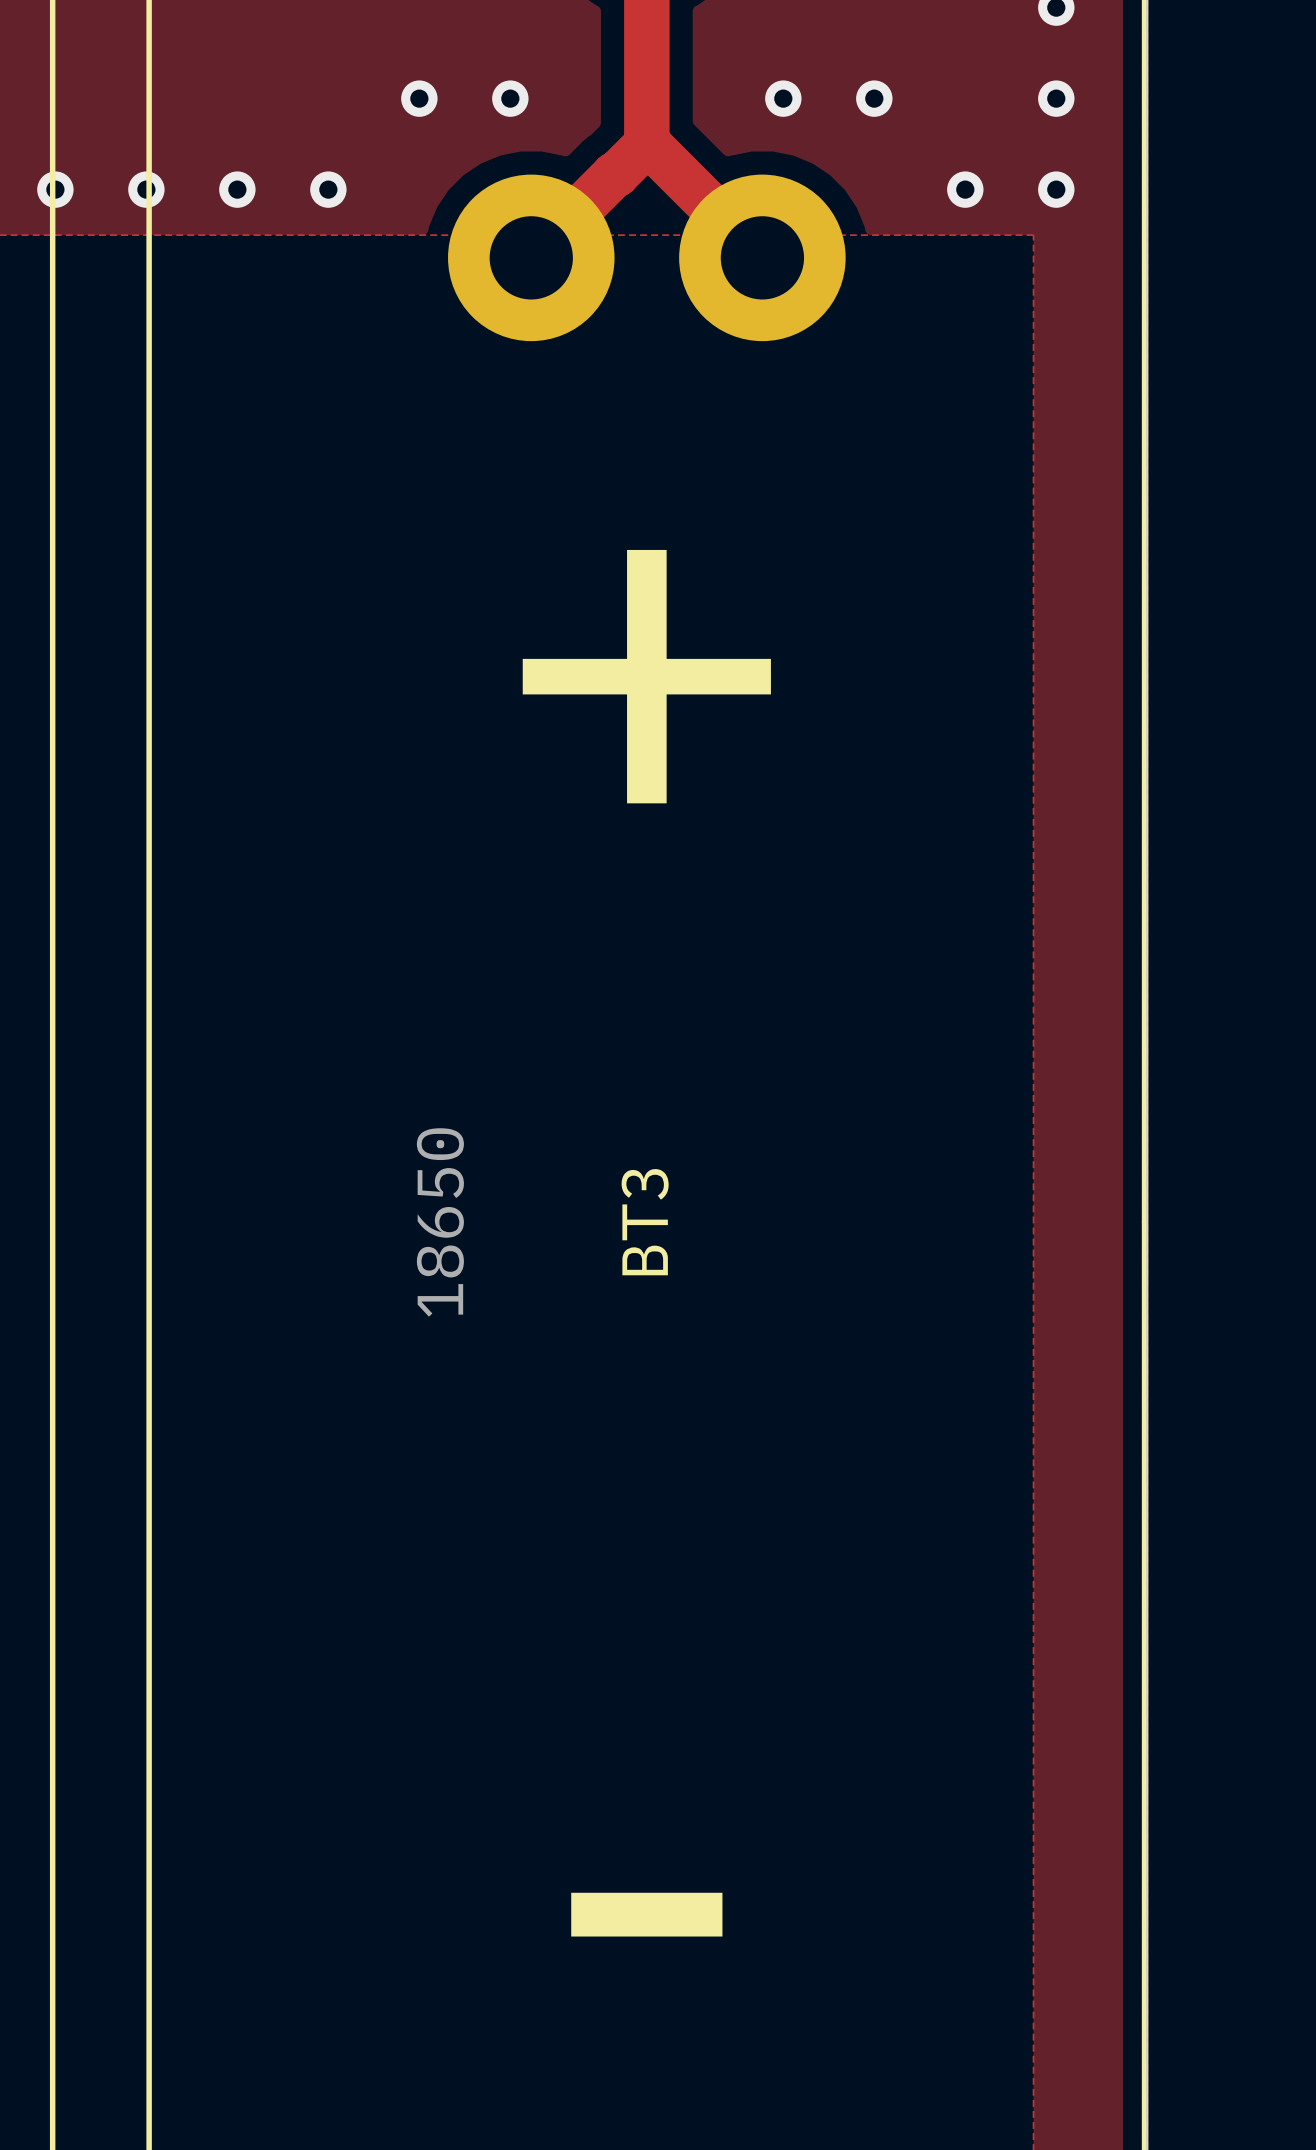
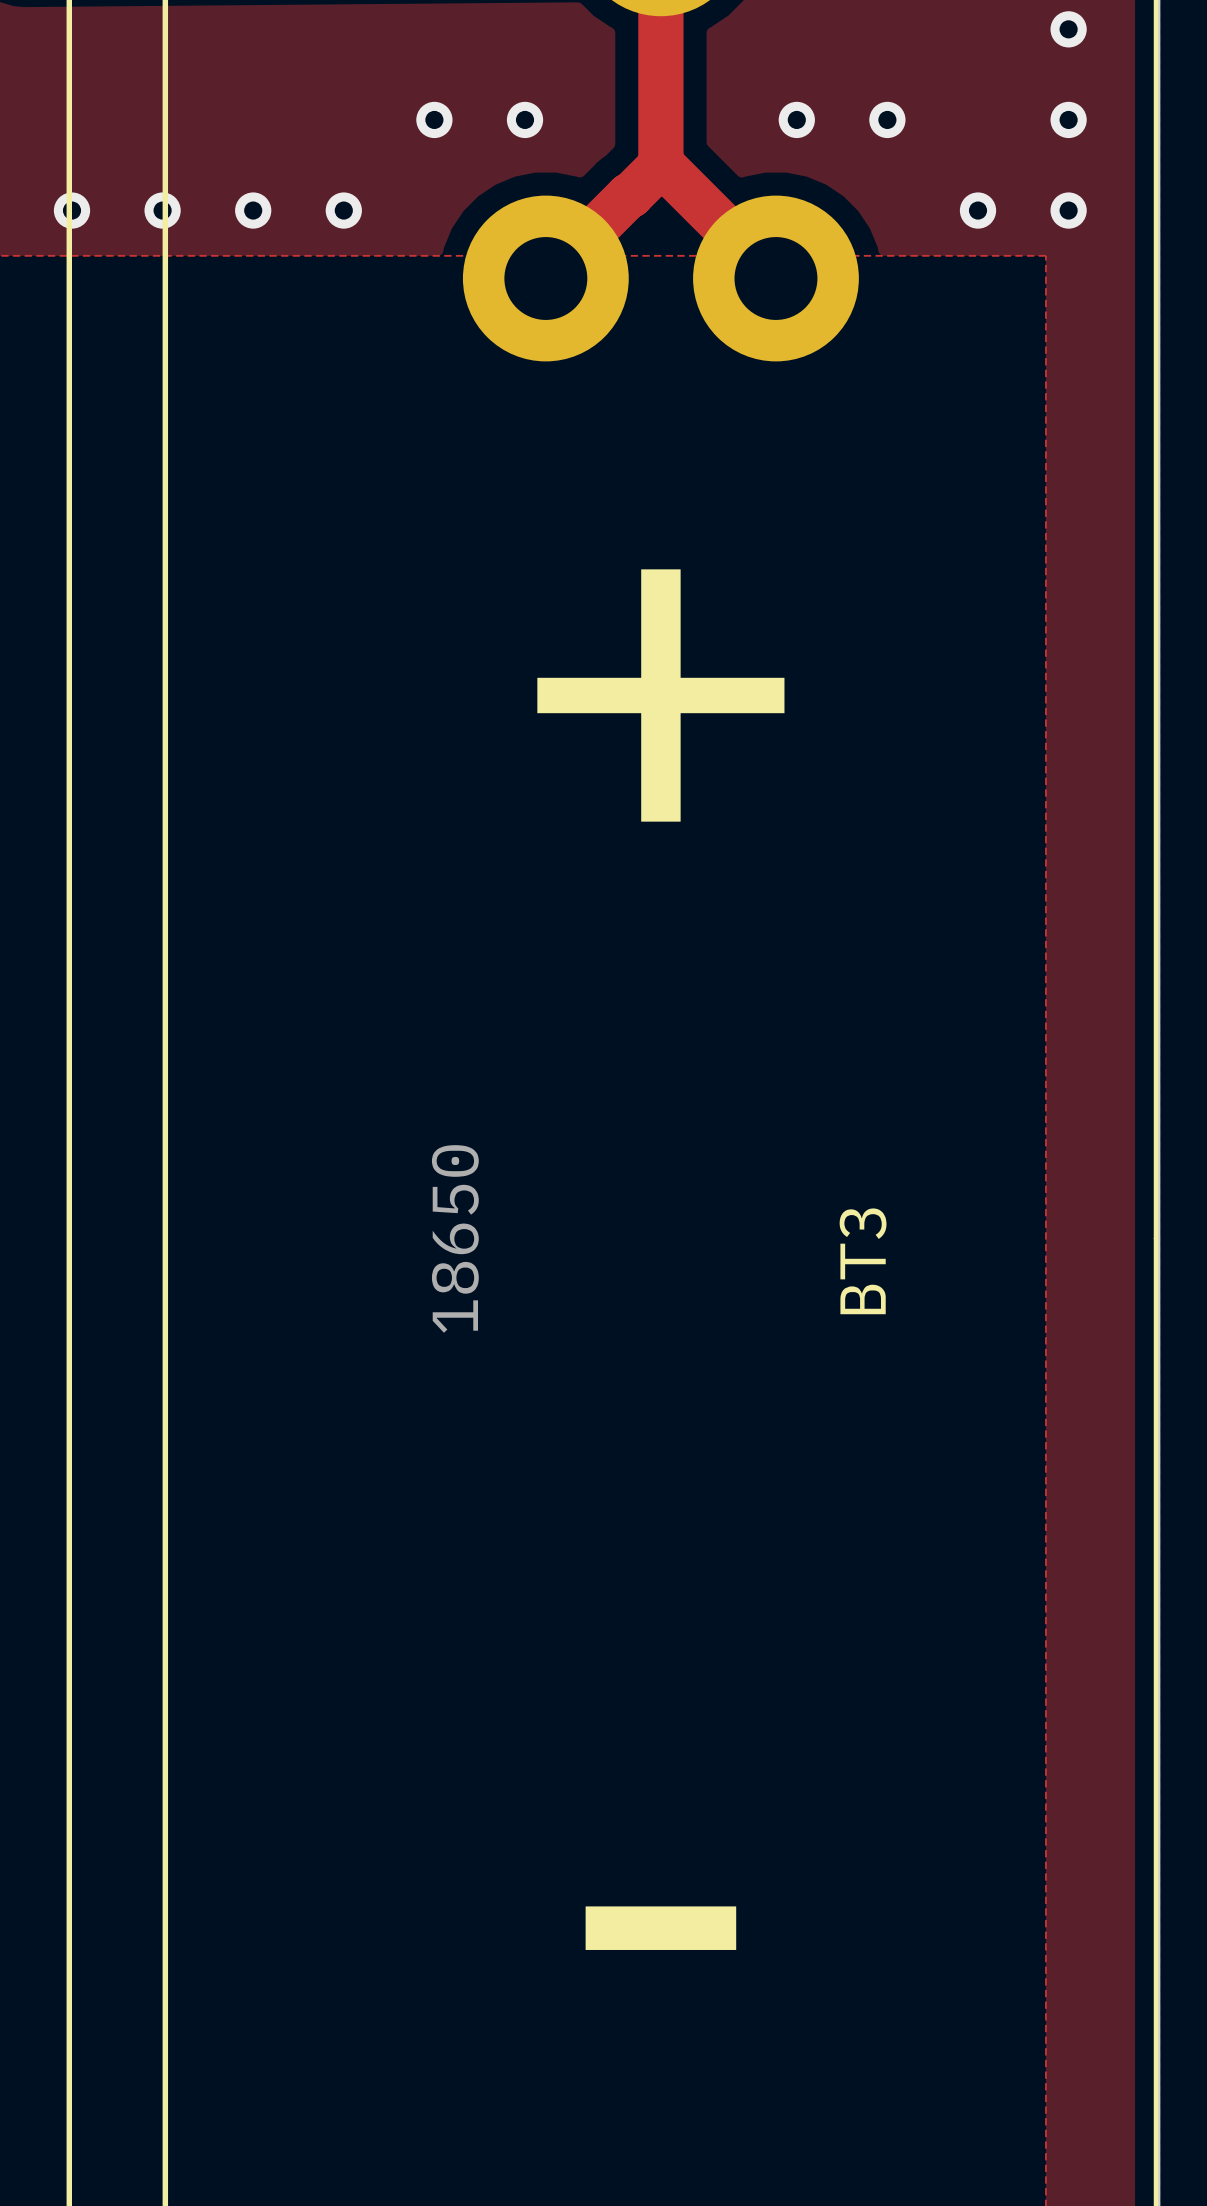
BT3 name position: BT3 (645, 1222) -> BT3 (863, 1261)

